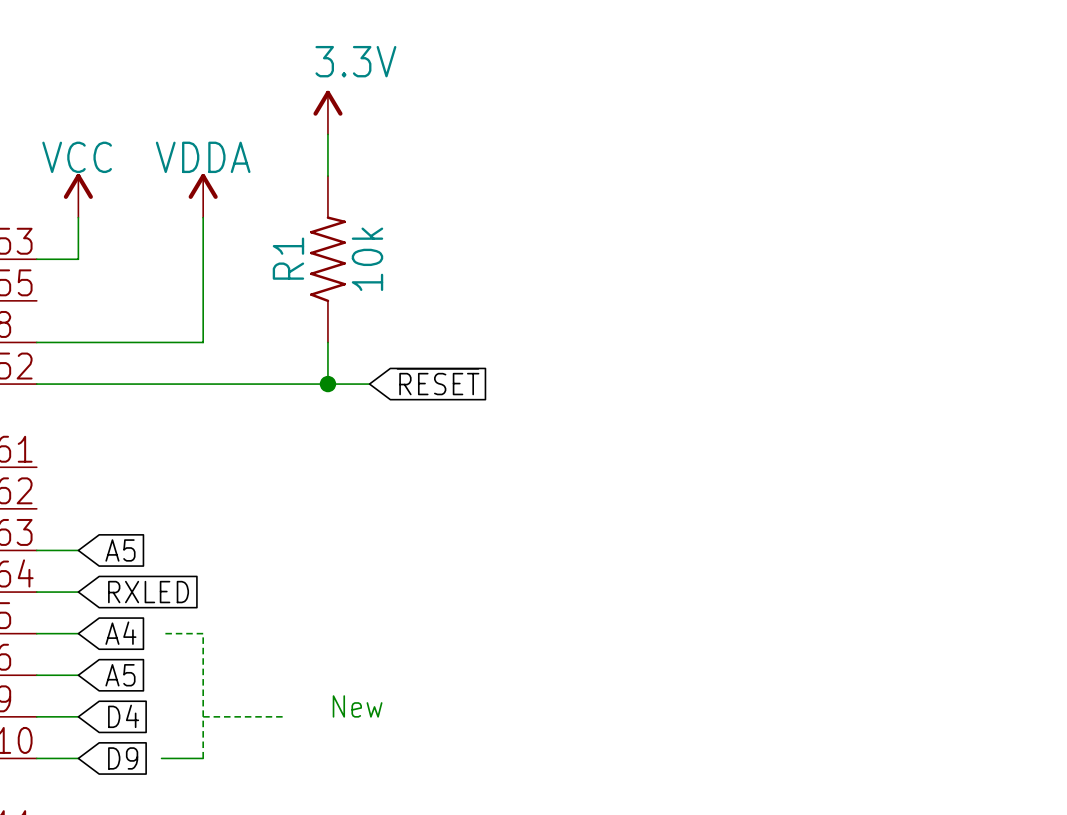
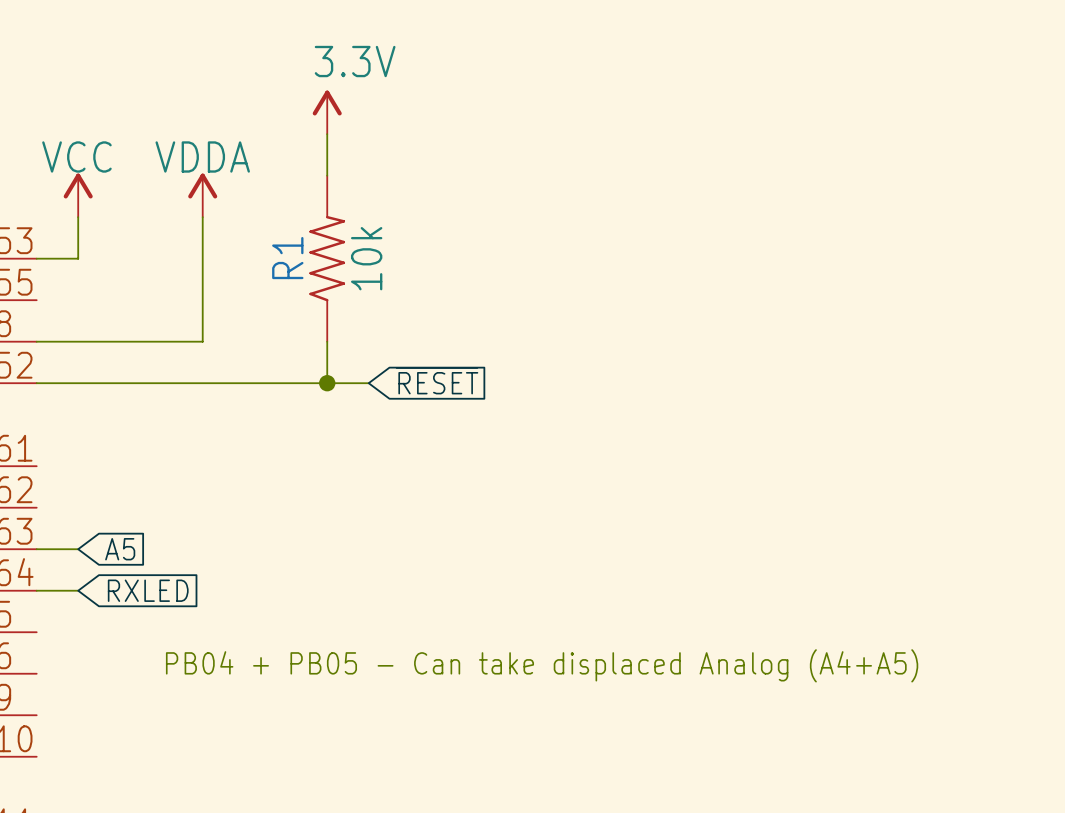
wire: (36, 633) (78, 633) -> none
global label: A4 (120, 633) -> none
wire: (161, 633) (203, 633) (203, 758) (161, 758) -> none
text: none -> PB04 + PB05 - Can take displaced Analog (A4+A5) (542, 665)
wire: (36, 675) (78, 675) -> none
global label: A5 (120, 675) -> none
text: New (357, 706) -> none
wire: (36, 716) (78, 716) -> none
global label: D4 (123, 716) -> none
wire: (203, 716) (286, 716) -> none
wire: (36, 758) (78, 758) -> none
global label: D9 (123, 758) -> none

